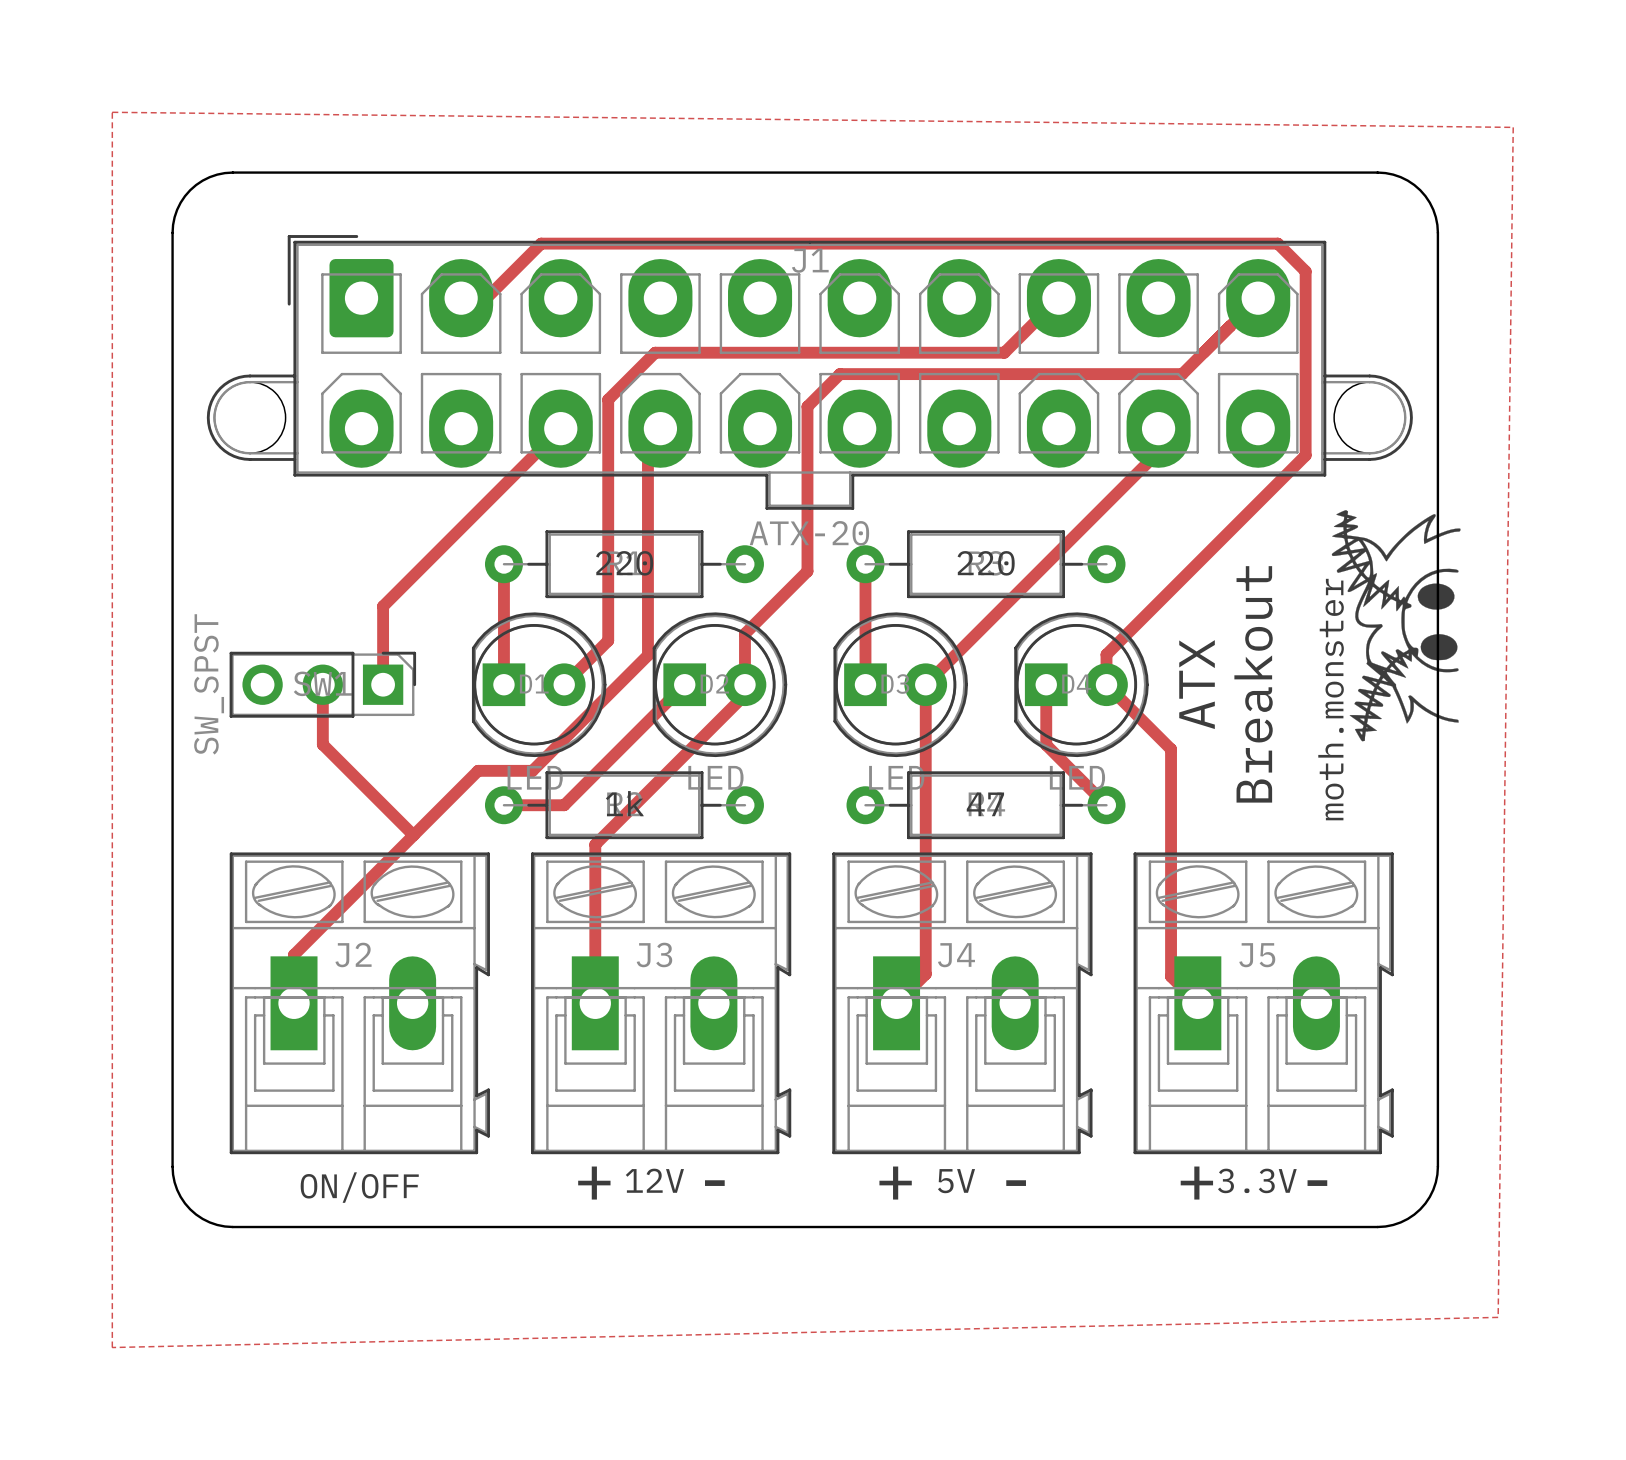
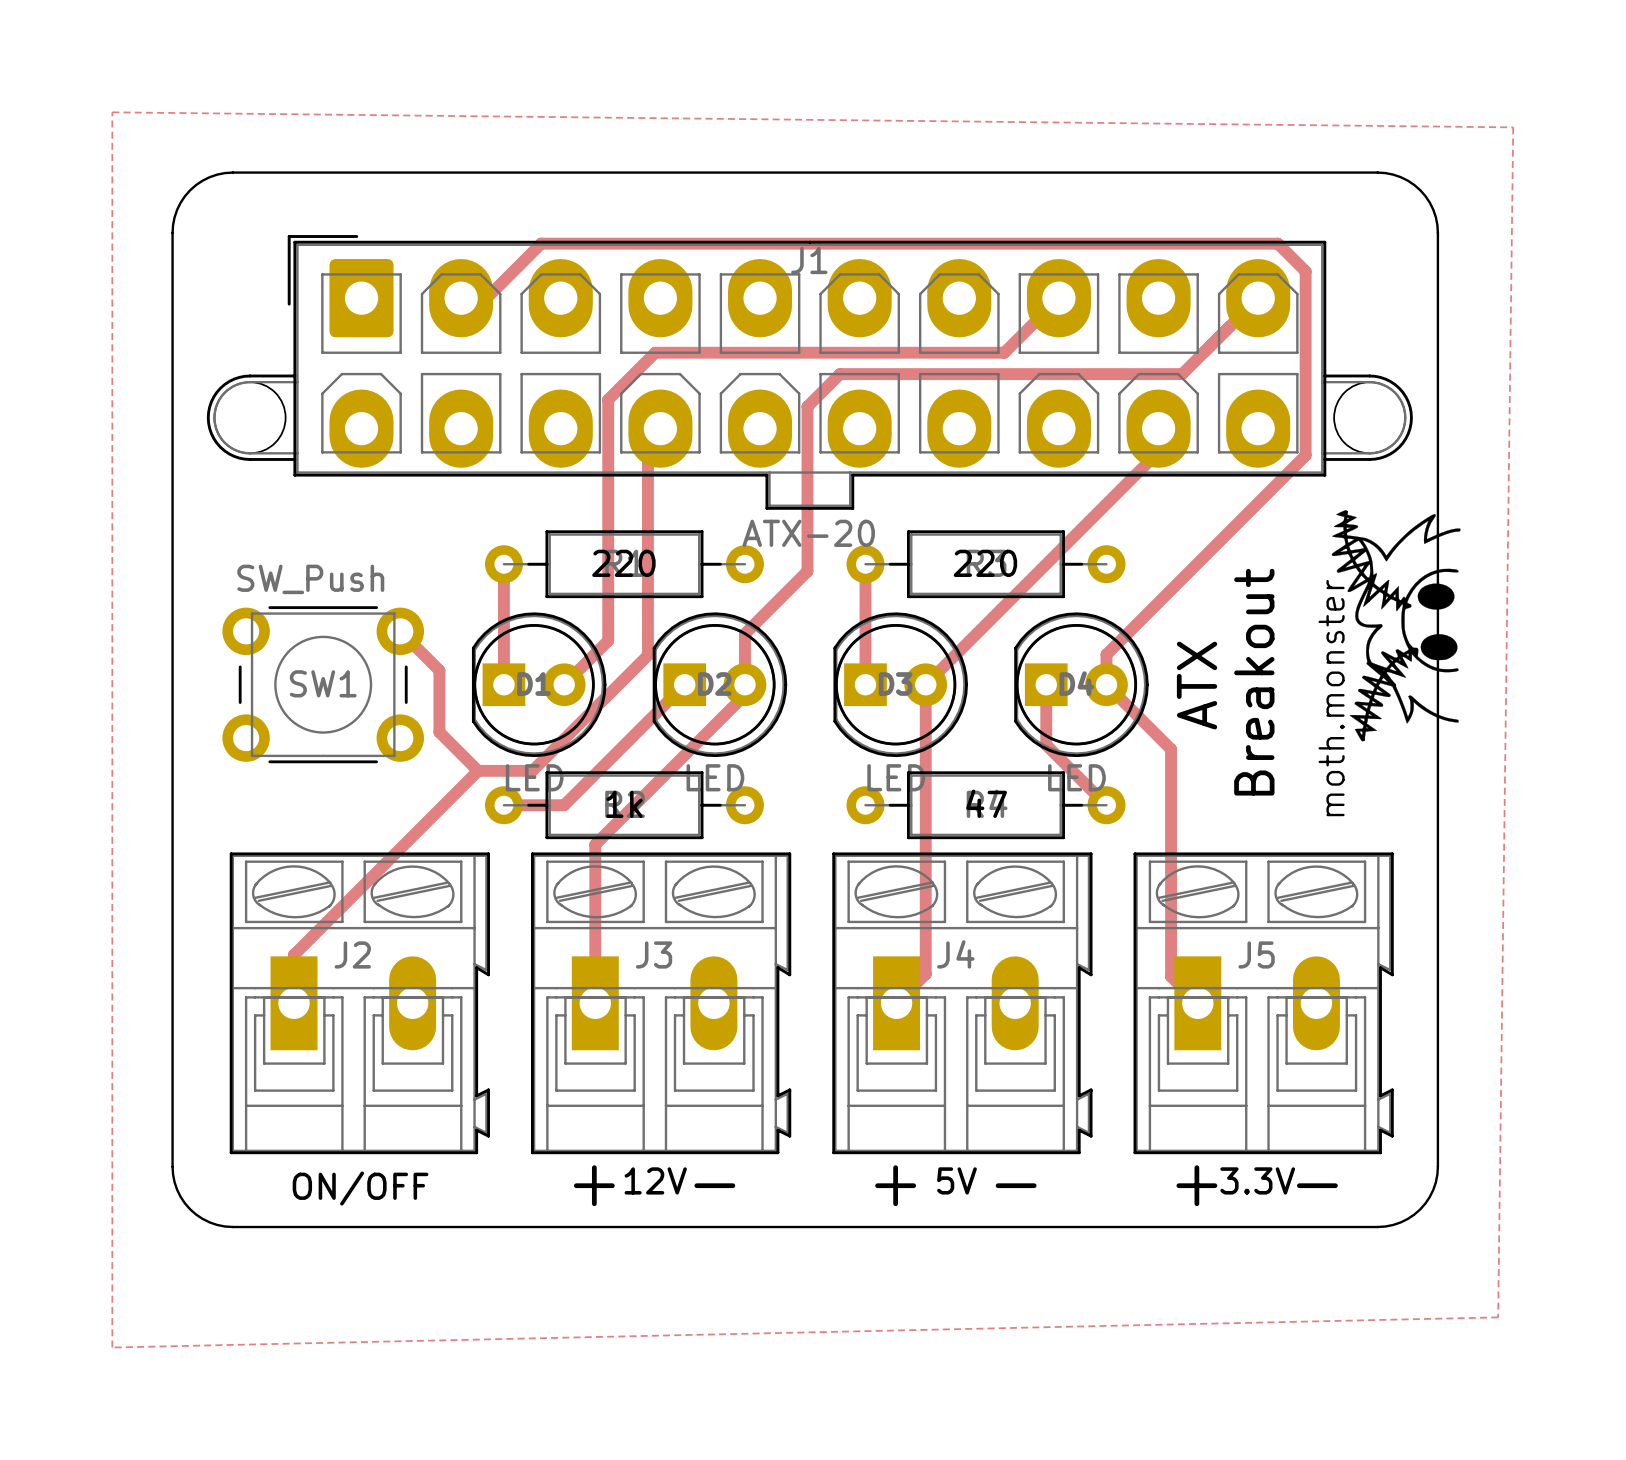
top track: (560, 428) (383, 606) (383, 684) -> none
top track: none -> (400, 631) (439, 670) (439, 732) (478, 770)
SW1 footprint: [229, 651, 417, 718] -> [222, 606, 425, 764]
SW1 value: SW_SPST (209, 684) -> SW_Push (310, 579)
top track: (322, 684) (322, 744) (413, 835) -> none

